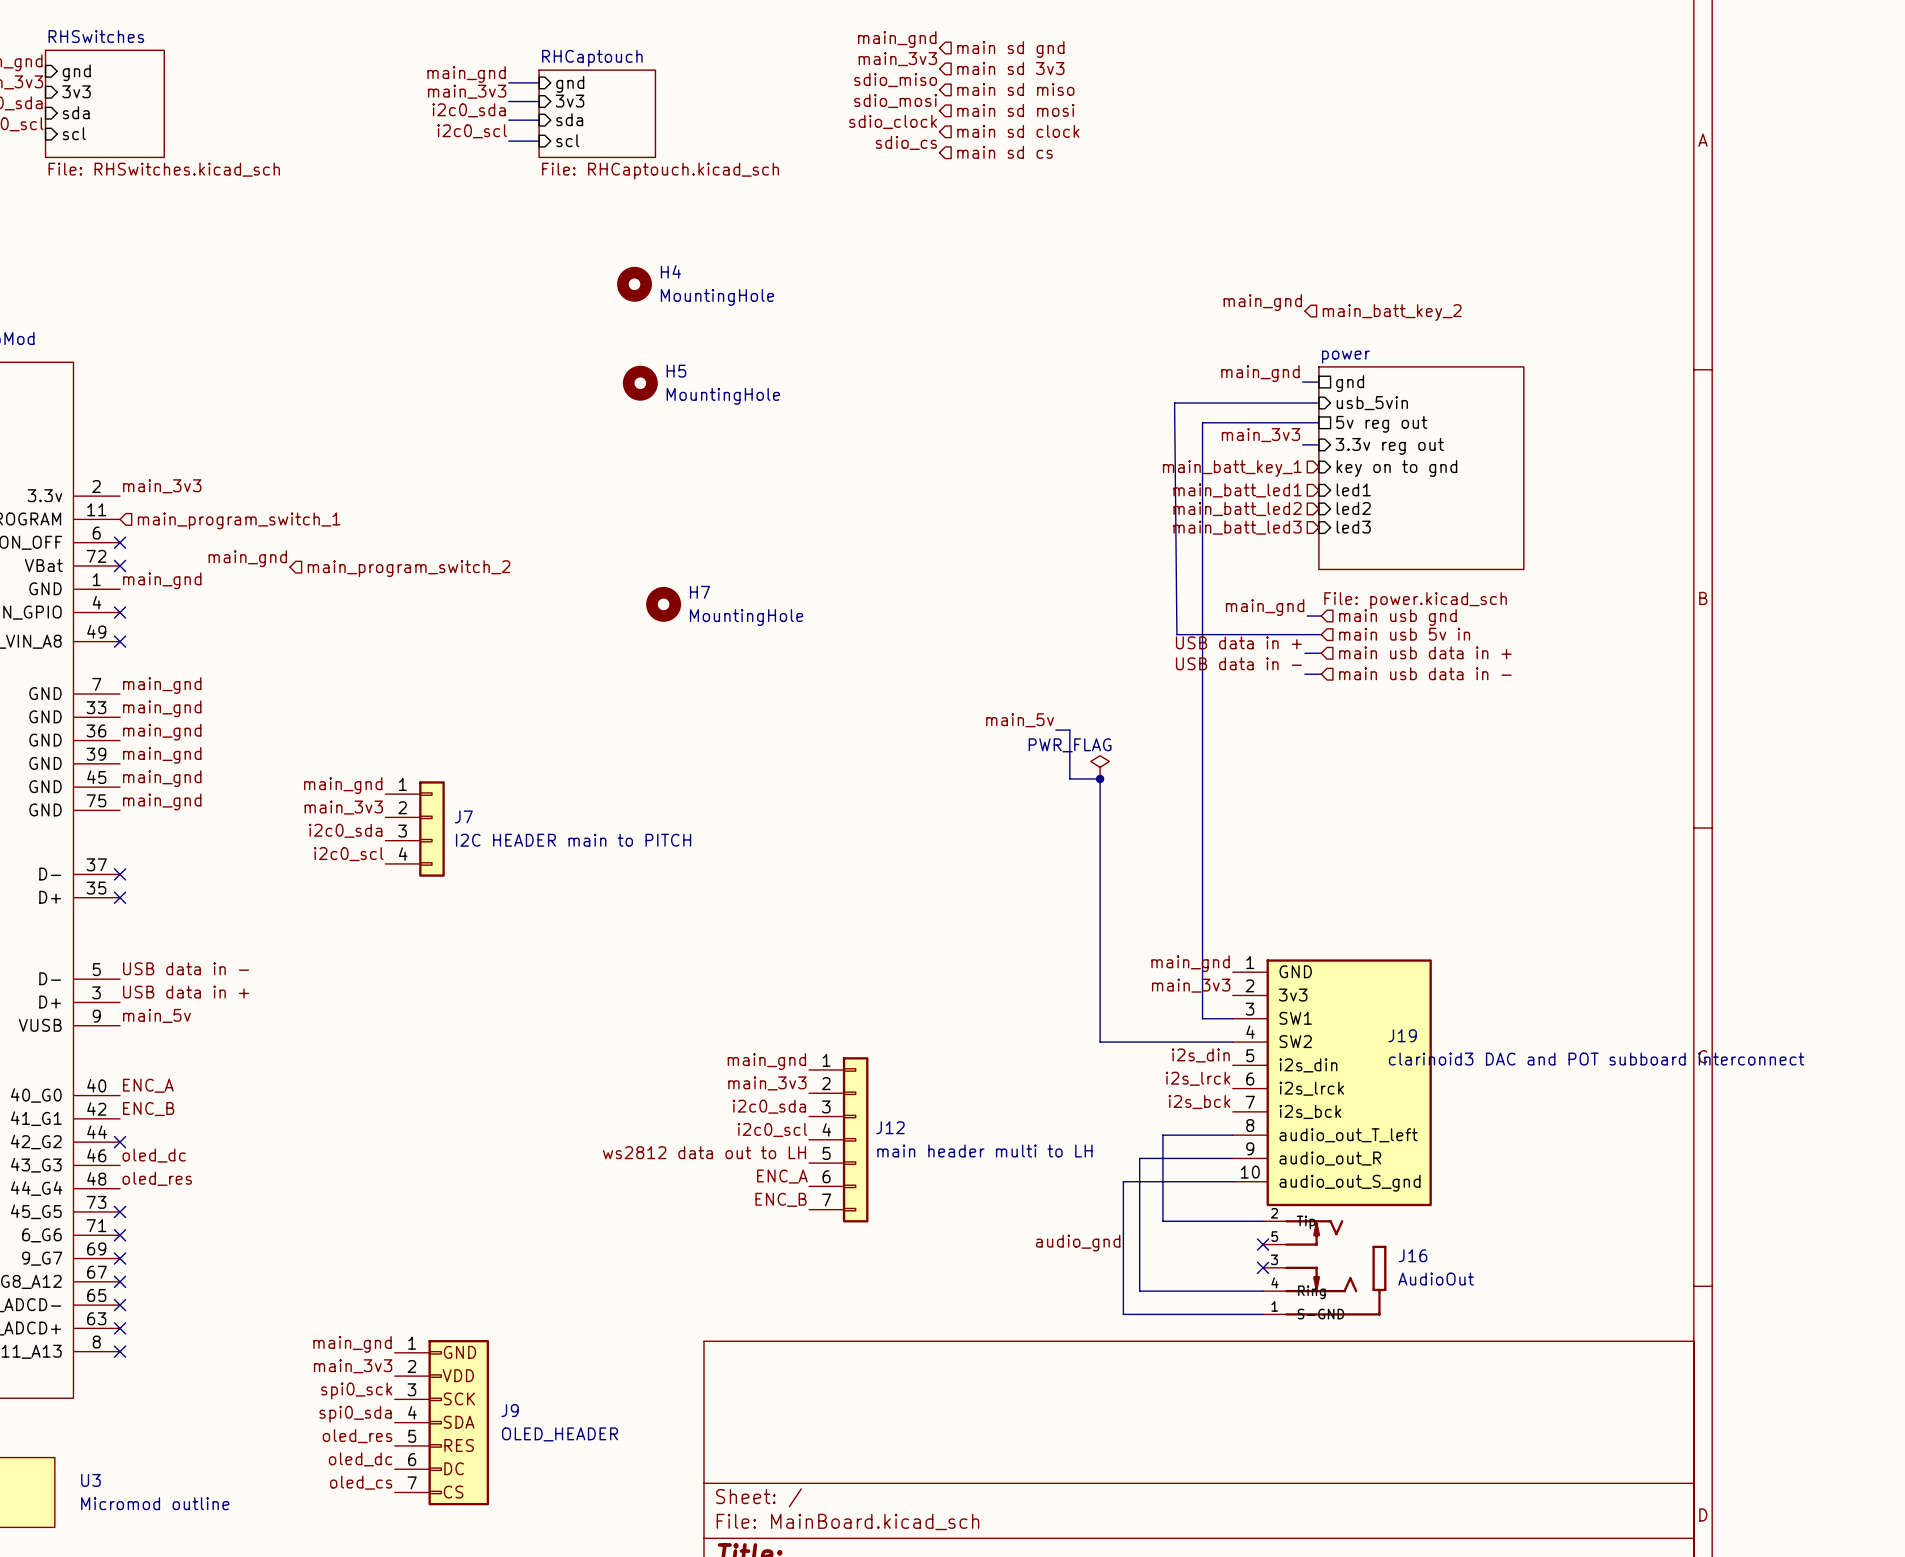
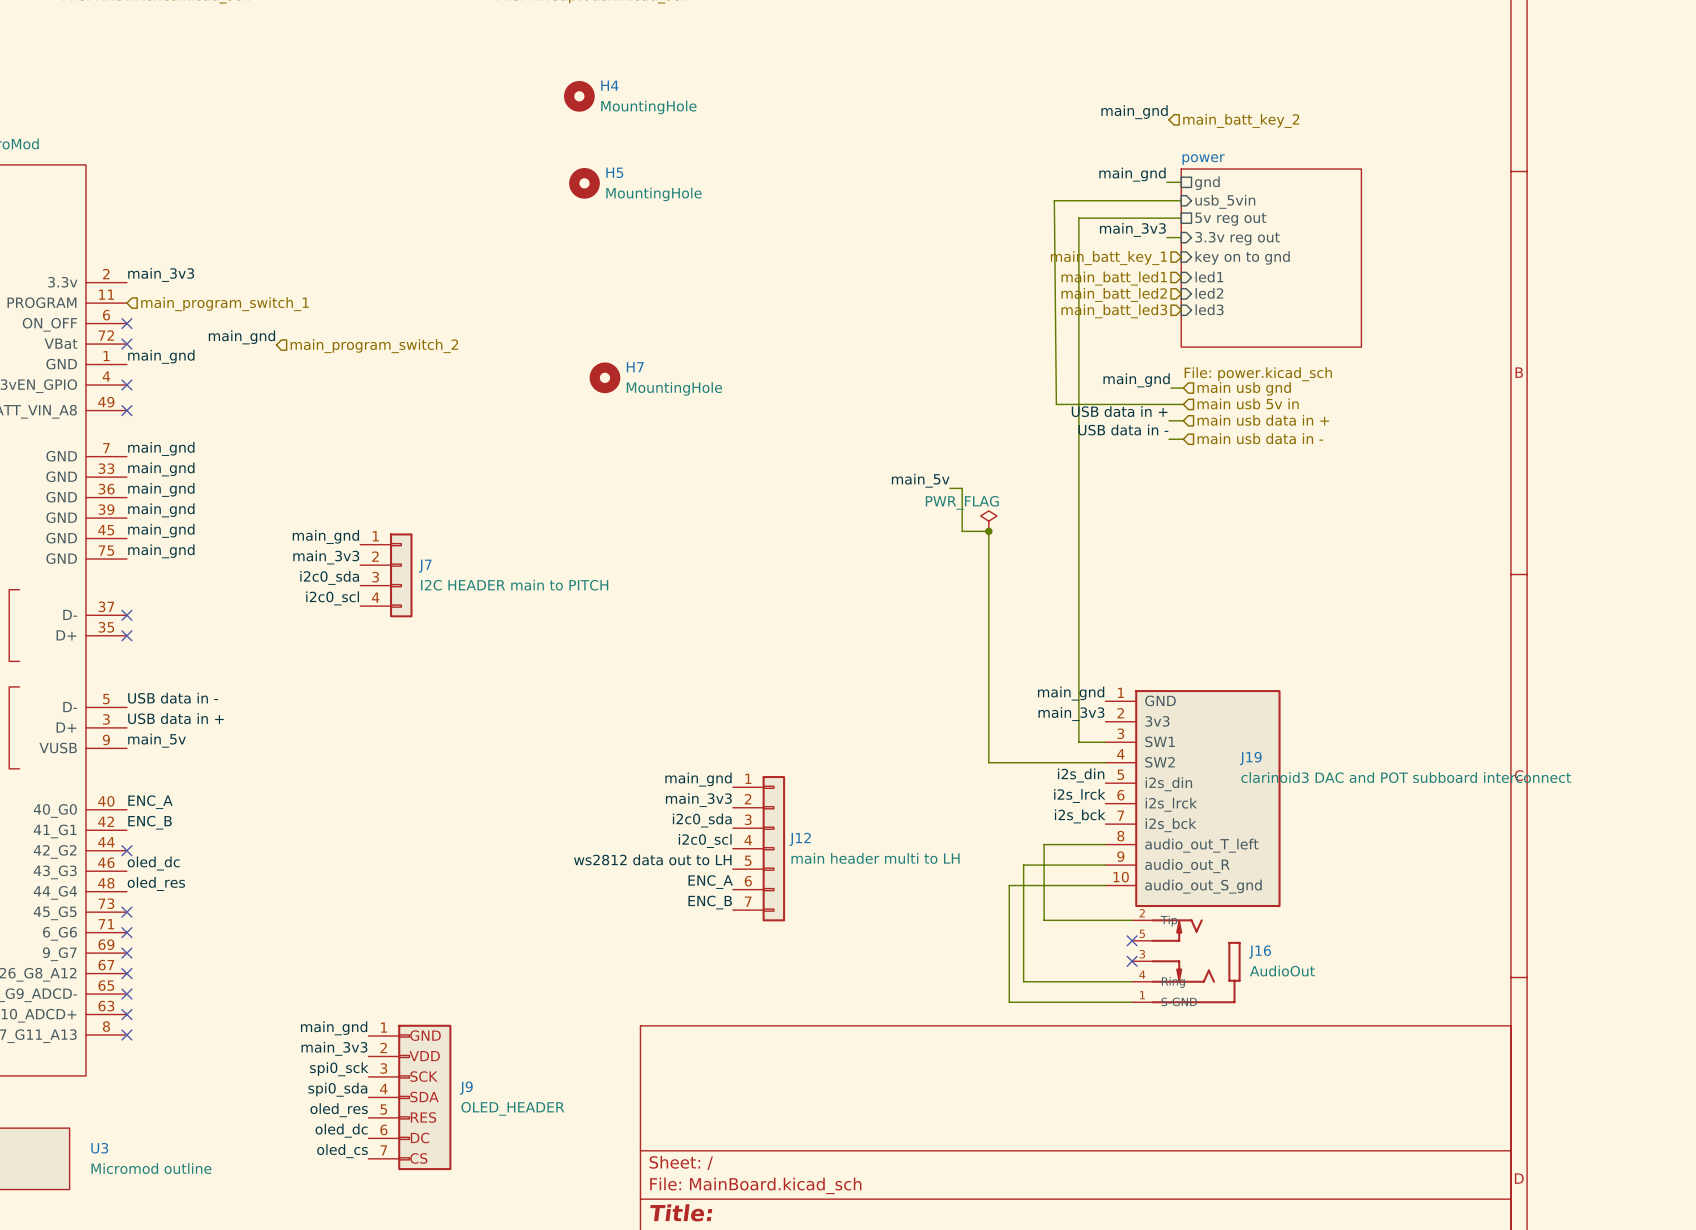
label: audio_gnd (1078, 1243) -> none

